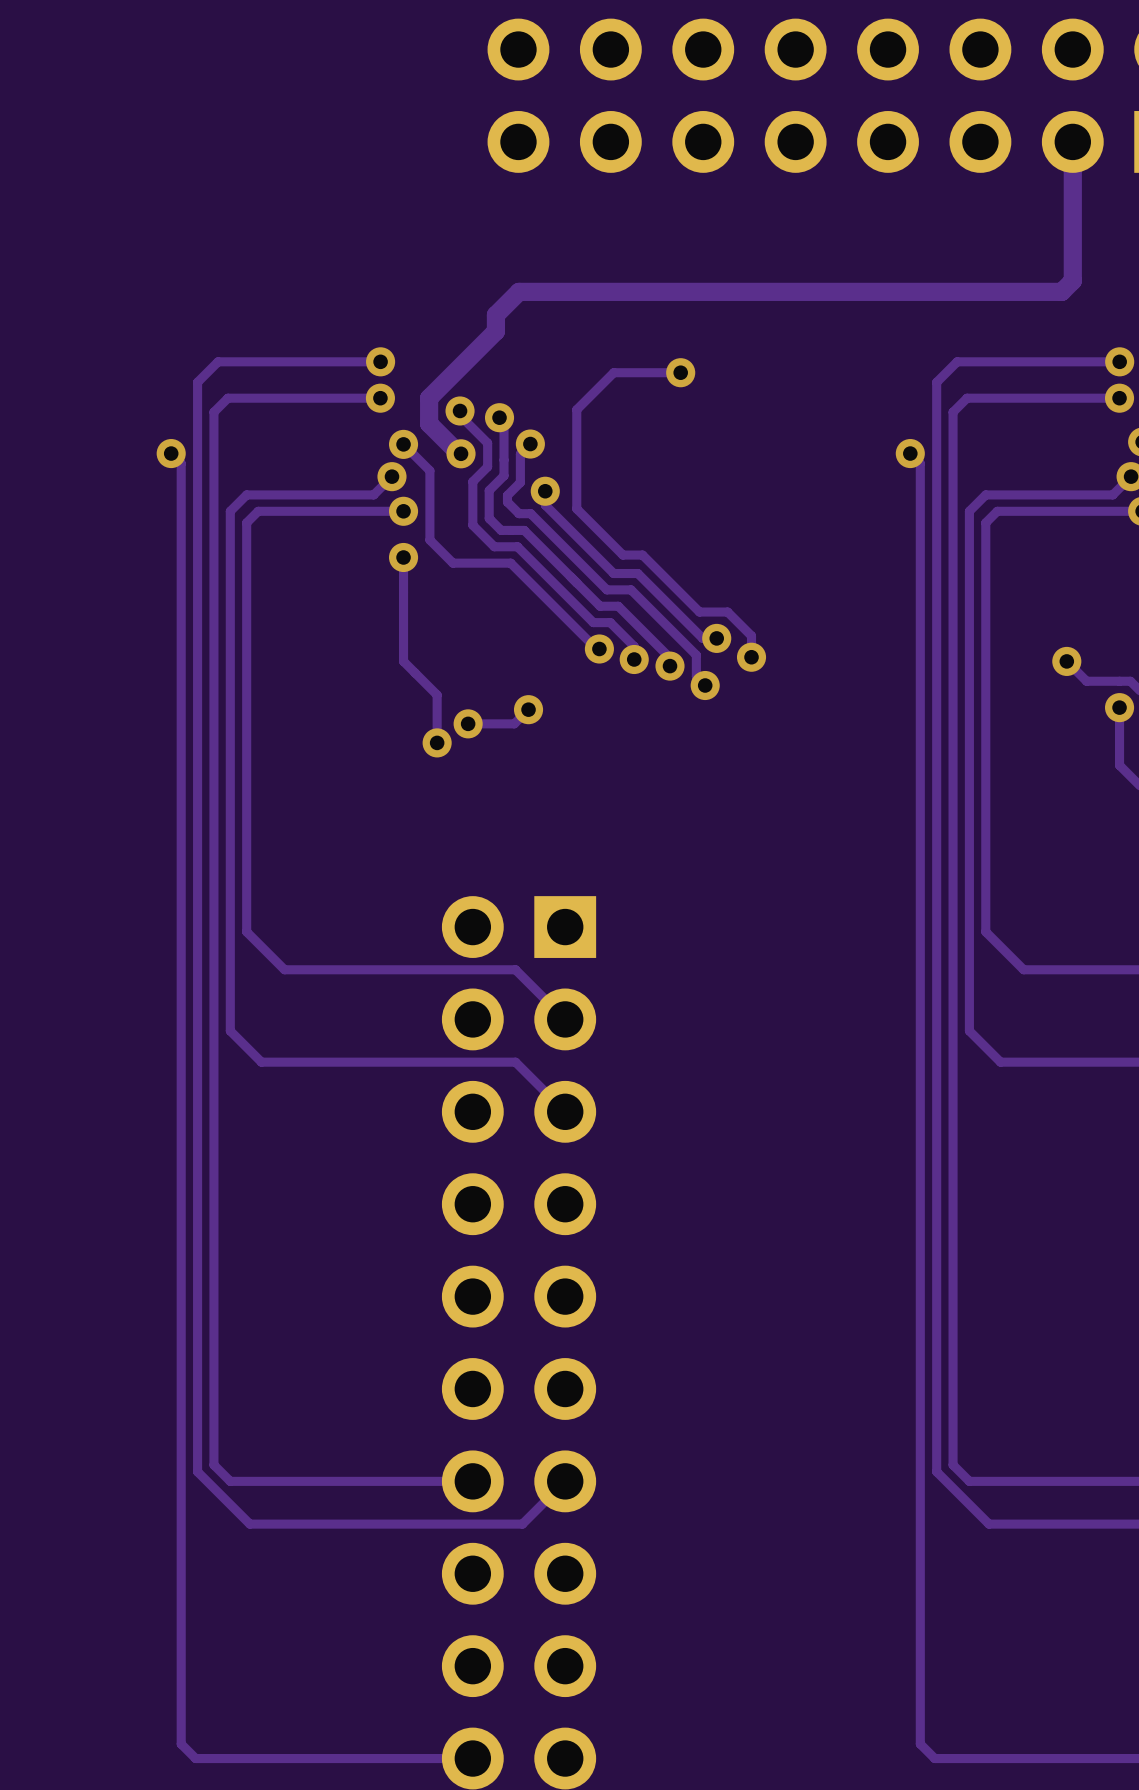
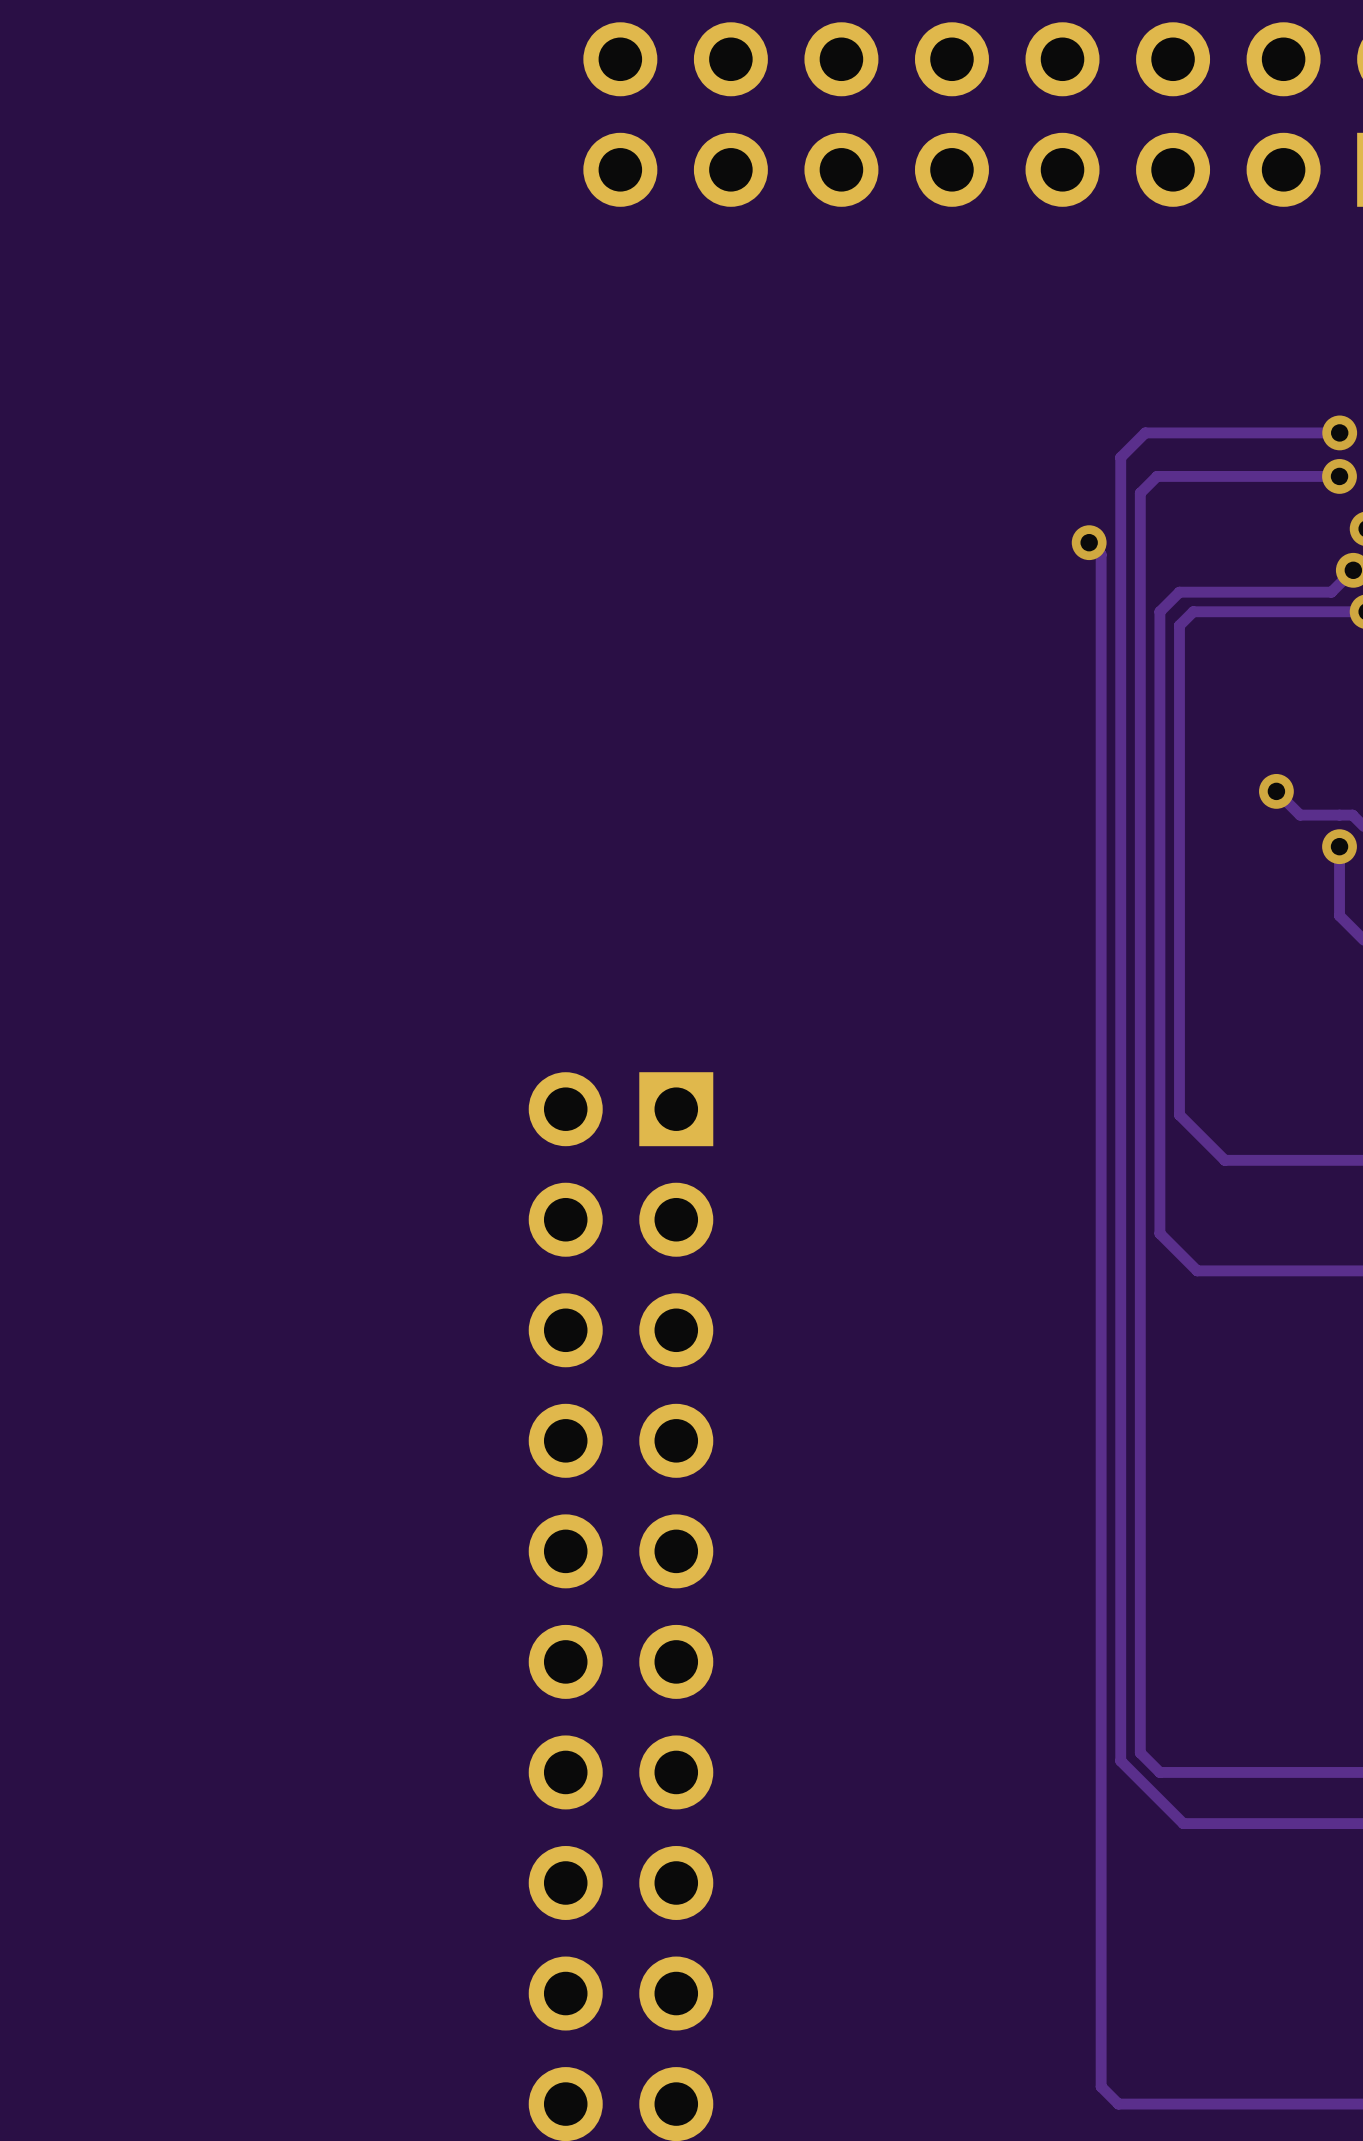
track: (1072, 141) (1072, 280) (1061, 291) (519, 291) (495, 314) (495, 331) (429, 398) (429, 423) (461, 453) -> none
track: (380, 361) (218, 361) (197, 382) (197, 1471) (249, 1524) (522, 1524) (565, 1481) -> none
via: (380, 361) -> none
track: (680, 372) (613, 372) (576, 409) (576, 508) (622, 555) (642, 555) (699, 612) (727, 612) (751, 635) (751, 657) -> none
via: (680, 372) -> none
track: (380, 398) (227, 398) (213, 412) (213, 1465) (230, 1481) (472, 1481) -> none
via: (380, 398) -> none
track: (460, 410) (460, 415) (487, 443) (487, 466) (472, 481) (472, 525) (494, 546) (517, 546) (593, 622) (610, 622) (634, 646) (634, 659) -> none
via: (460, 410) -> none
track: (499, 417) (504, 422) (504, 475) (489, 490) (489, 518) (501, 530) (524, 530) (600, 606) (618, 606) (670, 657) (670, 666) -> none
via: (499, 417) -> none
track: (403, 444) (429, 470) (429, 540) (453, 563) (510, 563) (596, 648) (599, 648) -> none
via: (403, 444) -> none
track: (530, 444) (520, 454) (520, 482) (507, 495) (507, 502) (519, 513) (530, 513) (606, 589) (631, 589) (696, 655) (696, 676) (705, 685) -> none
via: (530, 444) -> none
track: (171, 453) (181, 463) (181, 1744) (195, 1758) (472, 1758) -> none
via: (171, 453) -> none
via: (461, 453) -> none
track: (391, 476) (373, 494) (246, 494) (230, 511) (230, 1030) (261, 1062) (515, 1062) (565, 1111) -> none
via: (391, 476) -> none
track: (545, 491) (545, 505) (613, 573) (637, 573) (702, 638) (716, 638) -> none
via: (545, 491) -> none
track: (403, 511) (258, 511) (246, 522) (246, 931) (284, 969) (515, 969) (565, 1019) -> none
via: (403, 511) -> none
track: (403, 557) (403, 661) (437, 695) (437, 742) -> none
via: (403, 557) -> none
via: (716, 638) -> none
via: (599, 648) -> none
via: (751, 657) -> none
via: (634, 659) -> none
via: (670, 666) -> none
via: (705, 685) -> none
track: (528, 709) (514, 723) (468, 723) -> none
via: (528, 709) -> none
via: (468, 723) -> none
via: (437, 742) -> none

